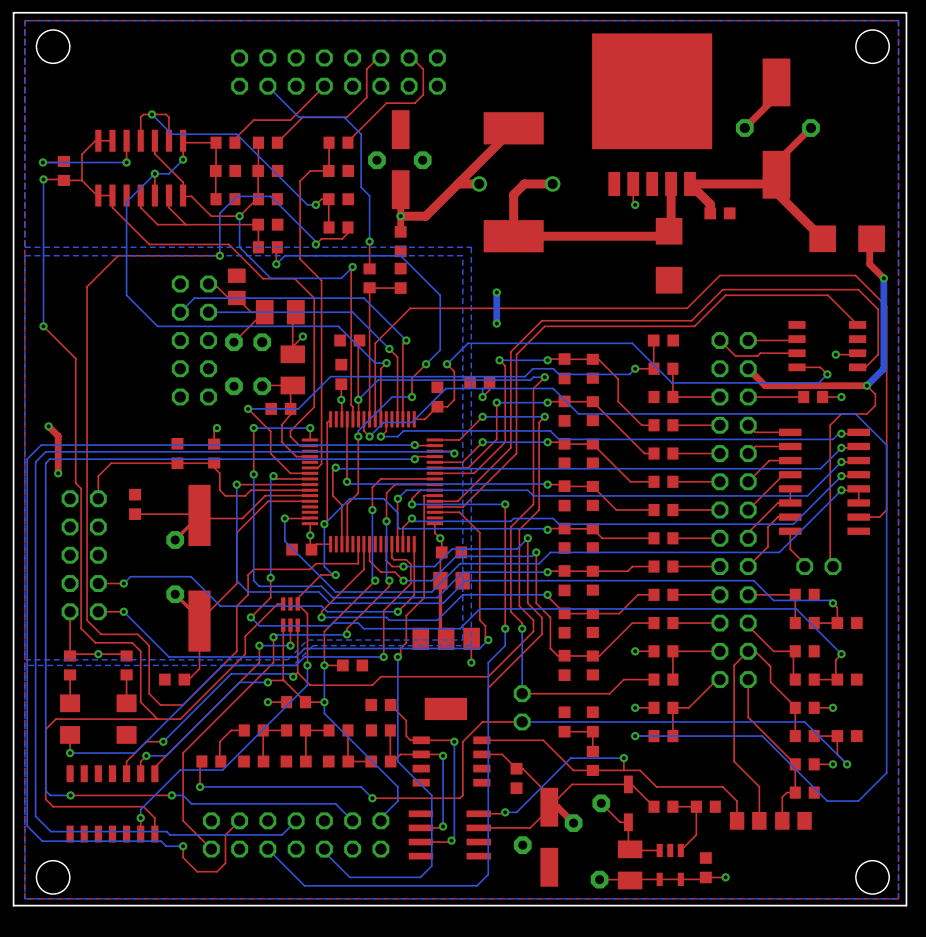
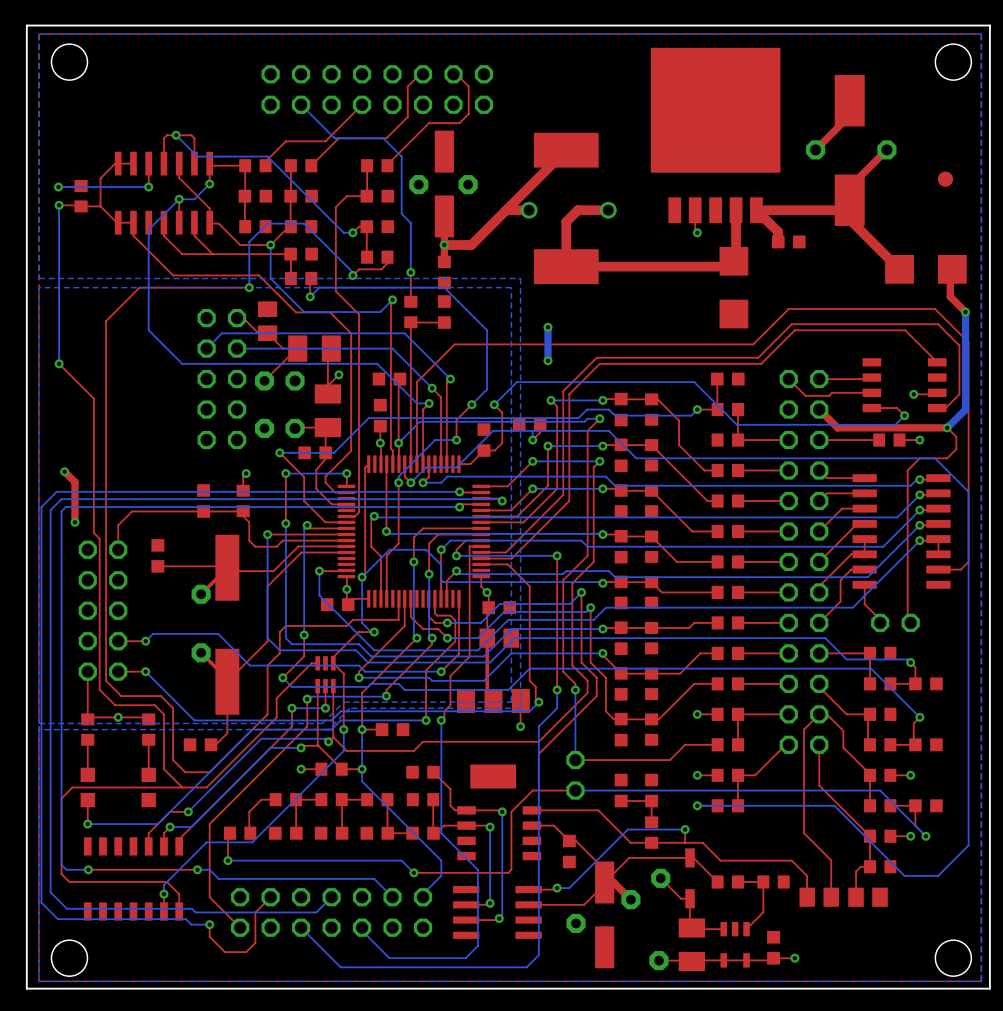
part: none -> (945, 179)
part footprint: [60, 694, 81, 744] -> [80, 767, 95, 808]
part footprint: [116, 694, 137, 744] -> [141, 767, 156, 808]

